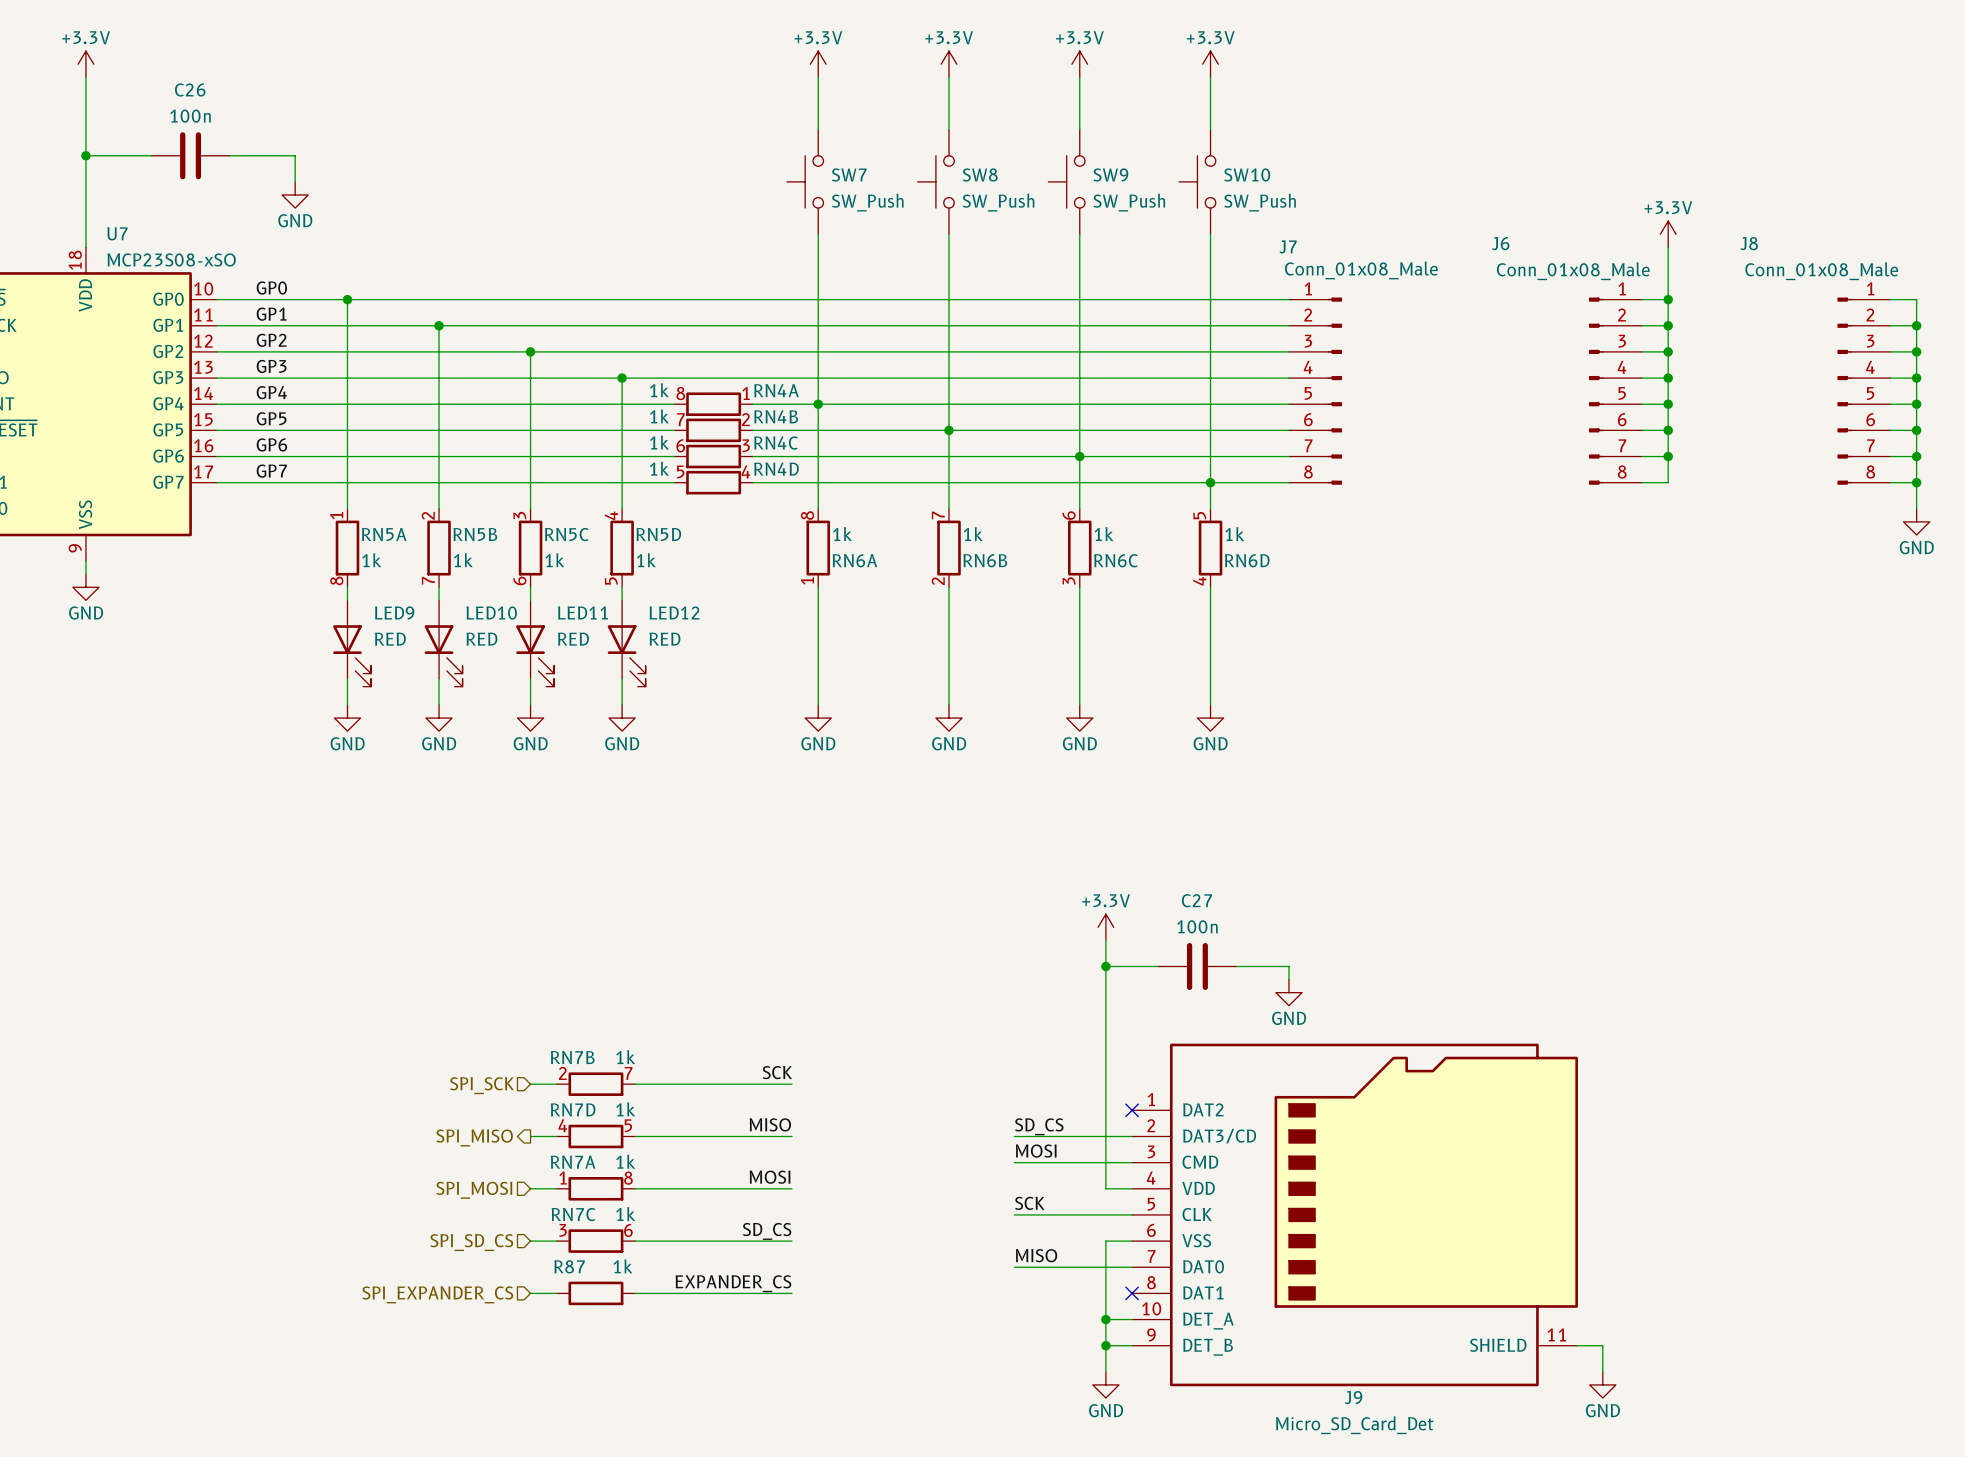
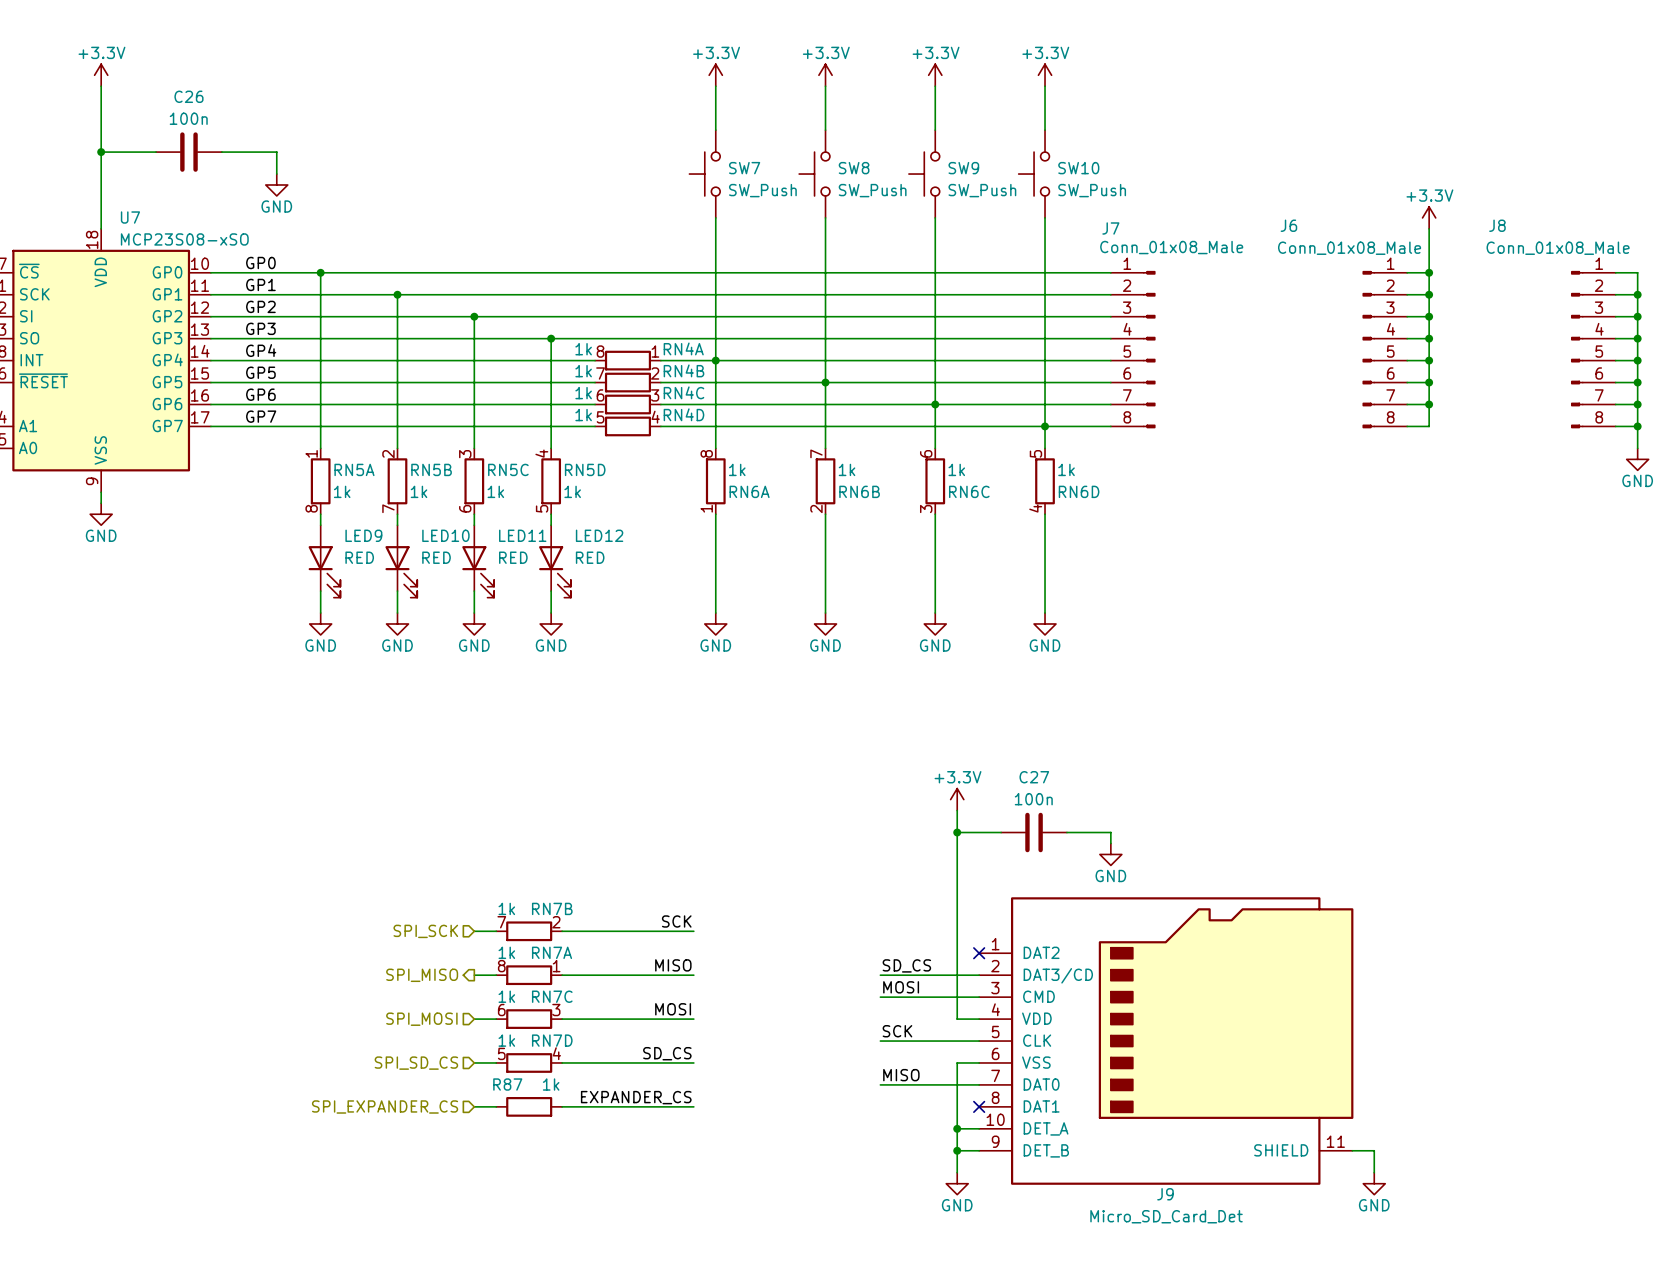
RN7B name position: RN7B (572, 1057) -> RN7B (552, 908)
RN7B value position: 1k (625, 1057) -> 1k (506, 908)
RN7B rotation: 0° (595, 1084) -> 180° (529, 931)
RN7D name position: RN7D (573, 1109) -> RN7D (552, 1040)
RN7D value position: 1k (625, 1109) -> 1k (506, 1040)
RN7D rotation: 0° (595, 1136) -> 180° (529, 1062)
RN7D position: (595, 1136) -> (529, 1062)
RN7A value position: 1k (625, 1161) -> 1k (506, 952)
RN7A name position: RN7A (573, 1162) -> RN7A (552, 952)
RN7A rotation: 0° (595, 1188) -> 180° (529, 975)
RN7A position: (595, 1188) -> (529, 975)
RN7C name position: RN7C (573, 1214) -> RN7C (552, 996)
RN7C value position: 1k (625, 1214) -> 1k (506, 996)
RN7C rotation: 0° (595, 1241) -> 180° (529, 1019)
RN7C position: (595, 1241) -> (529, 1019)

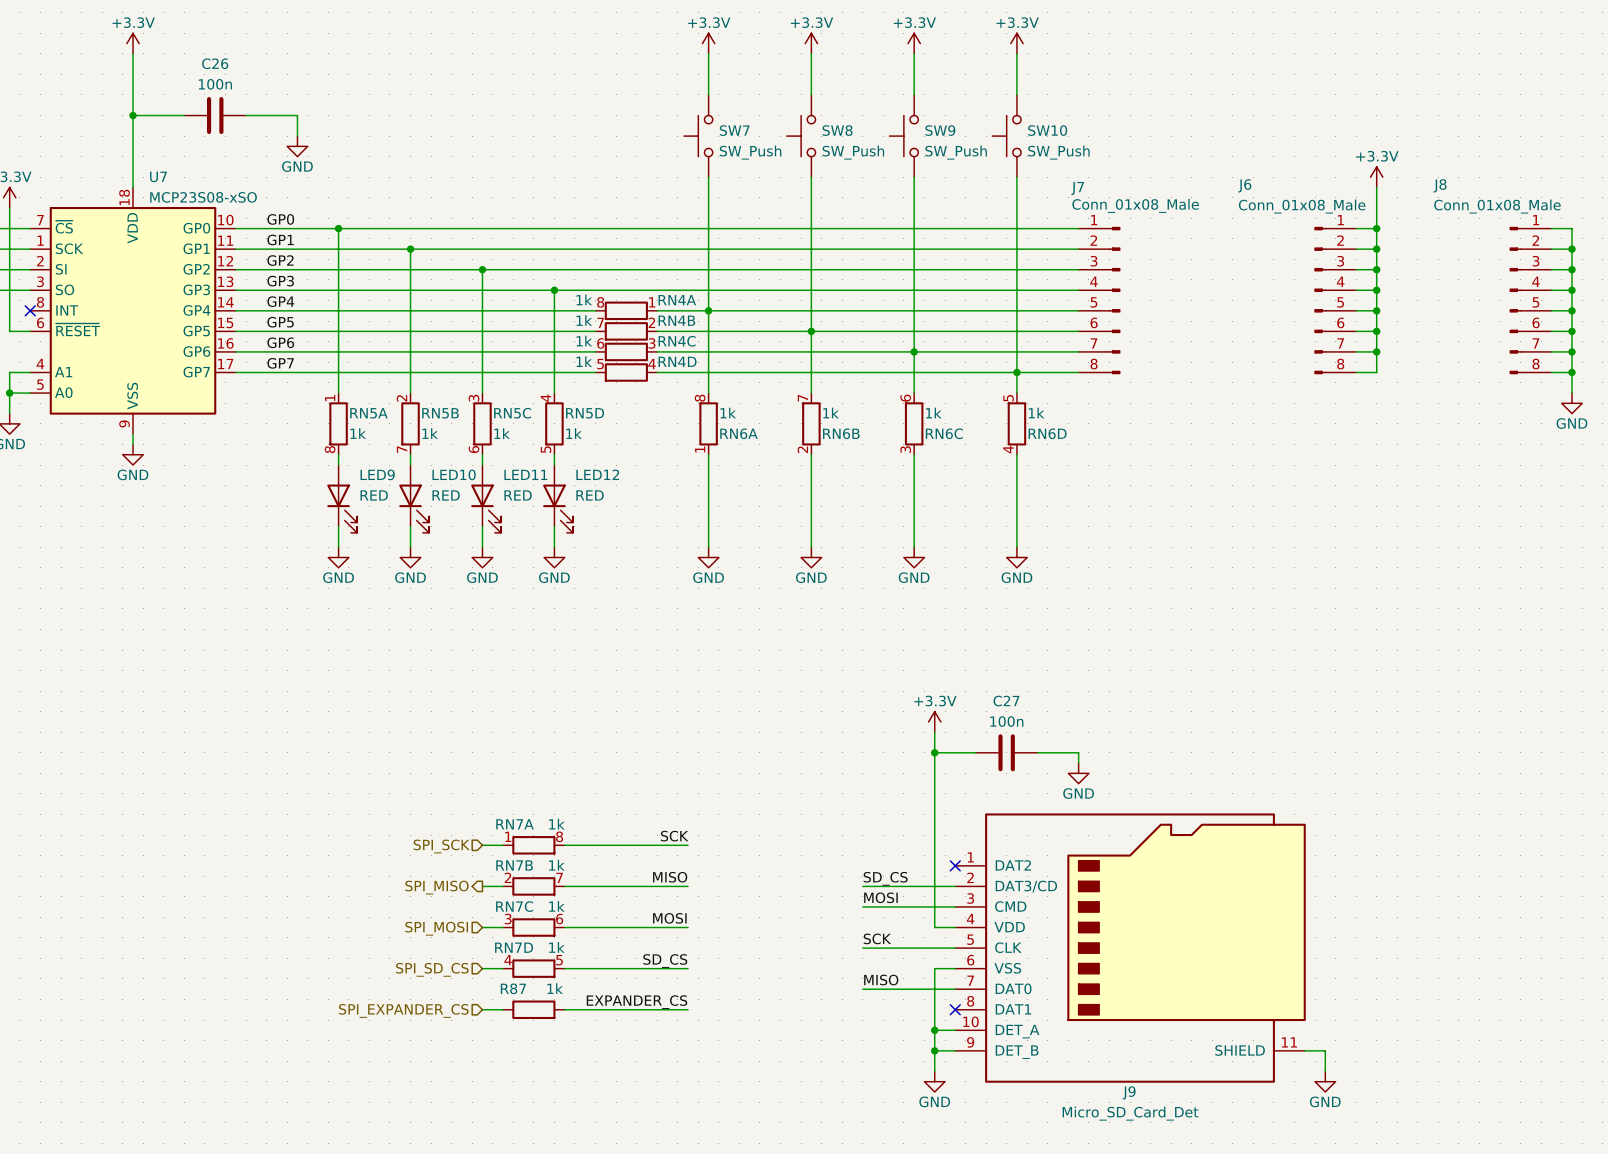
RN7B value position: 1k (506, 908) -> 1k (556, 865)
RN7B name position: RN7B (552, 908) -> RN7B (514, 865)
RN7B rotation: 0° (529, 931) -> 180° (533, 886)
RN7B position: (529, 931) -> (533, 886)
RN7A value position: 1k (506, 952) -> 1k (556, 824)
RN7A name position: RN7A (552, 952) -> RN7A (515, 824)
RN7A rotation: 0° (529, 975) -> 180° (533, 845)
RN7A position: (529, 975) -> (533, 845)
RN7C value position: 1k (506, 996) -> 1k (556, 906)
RN7C name position: RN7C (552, 996) -> RN7C (514, 906)
RN7C rotation: 0° (529, 1019) -> 180° (533, 927)
RN7D value position: 1k (506, 1040) -> 1k (556, 947)
RN7D name position: RN7D (552, 1040) -> RN7D (514, 947)
RN7D rotation: 0° (529, 1062) -> 180° (533, 968)

